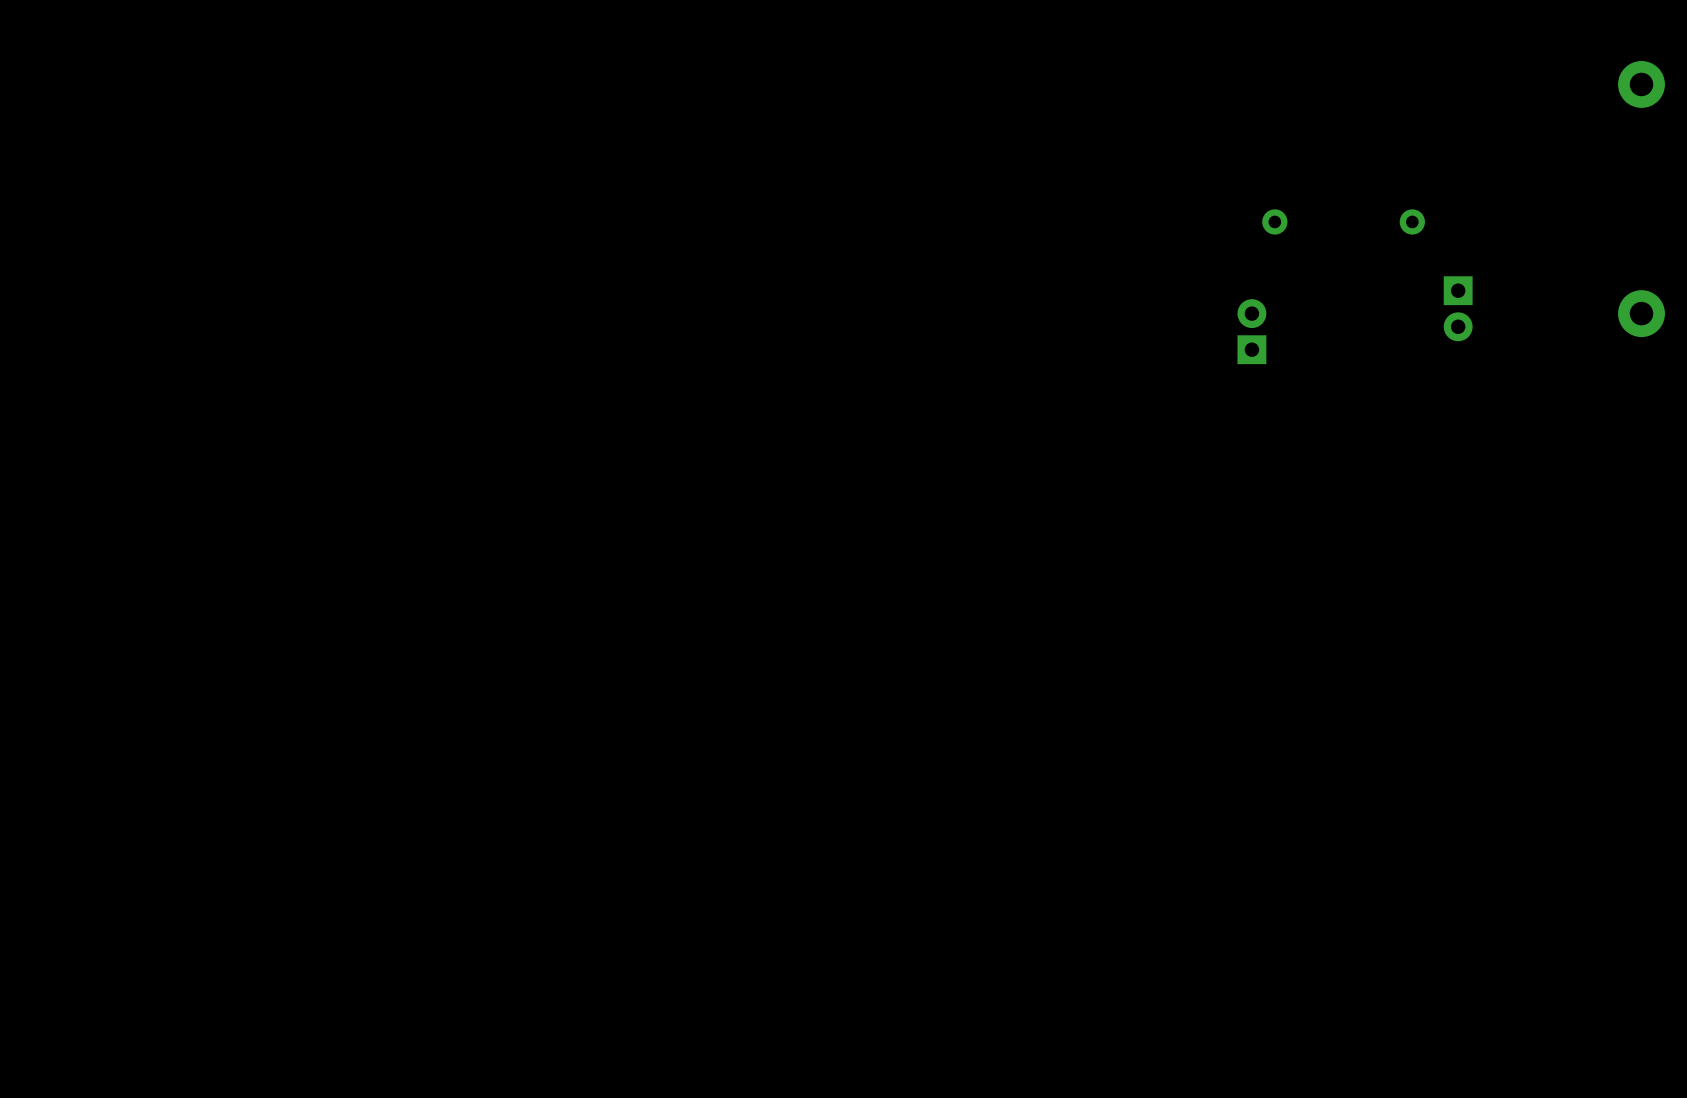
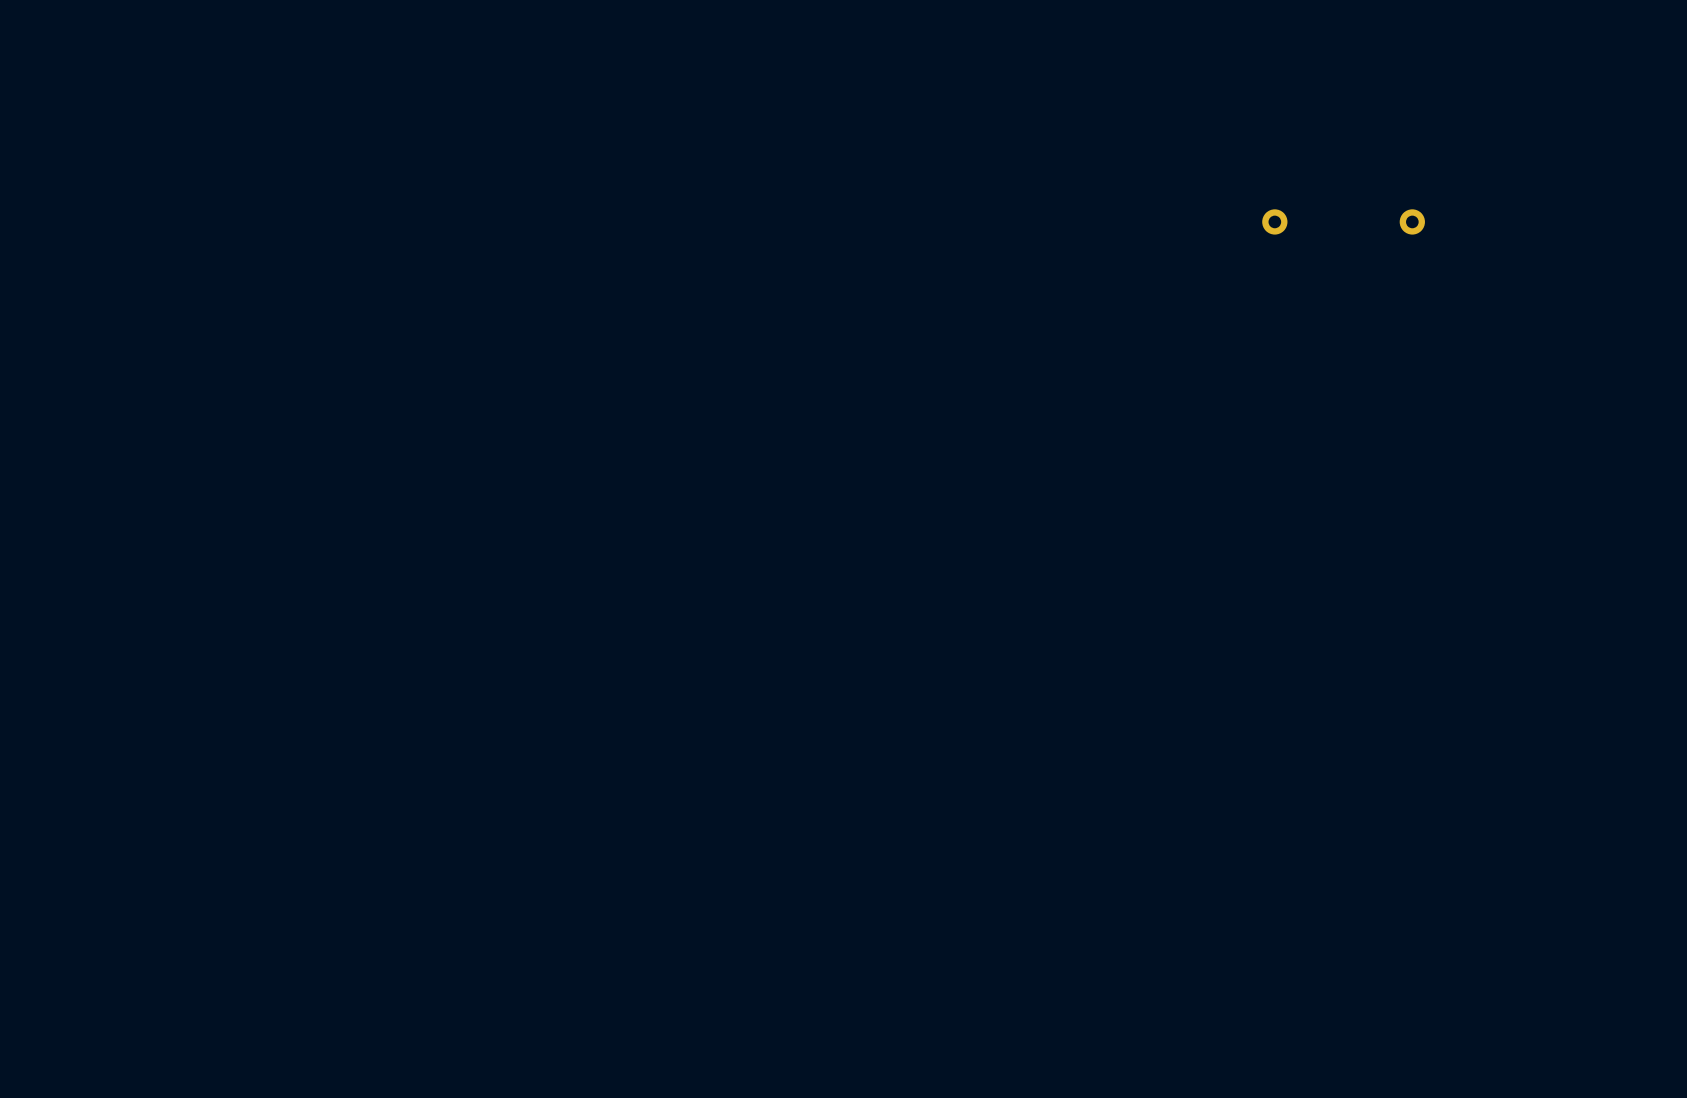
part: (1641, 84) -> none
part: (1458, 308) -> none
part: (1641, 313) -> none
part: (1251, 331) -> none

